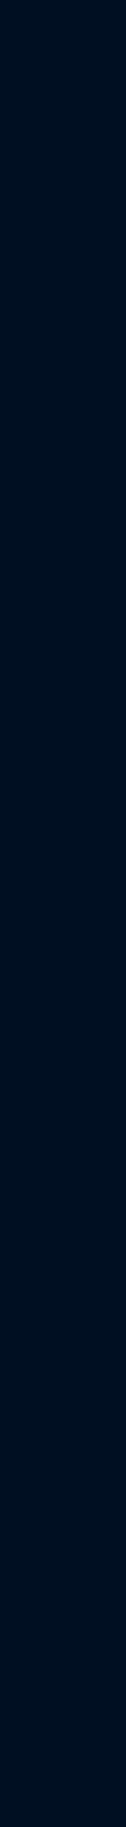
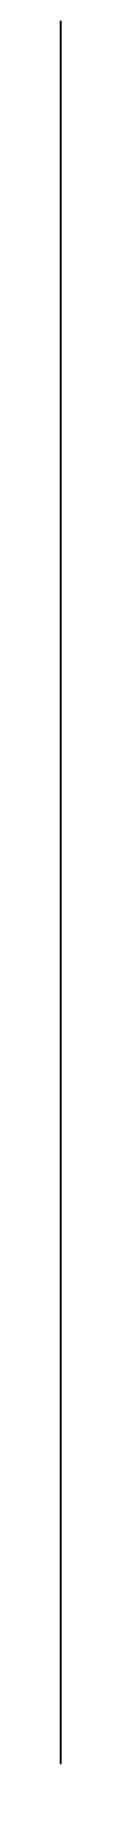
board edge: none -> (60, 21) (60, 1763)

